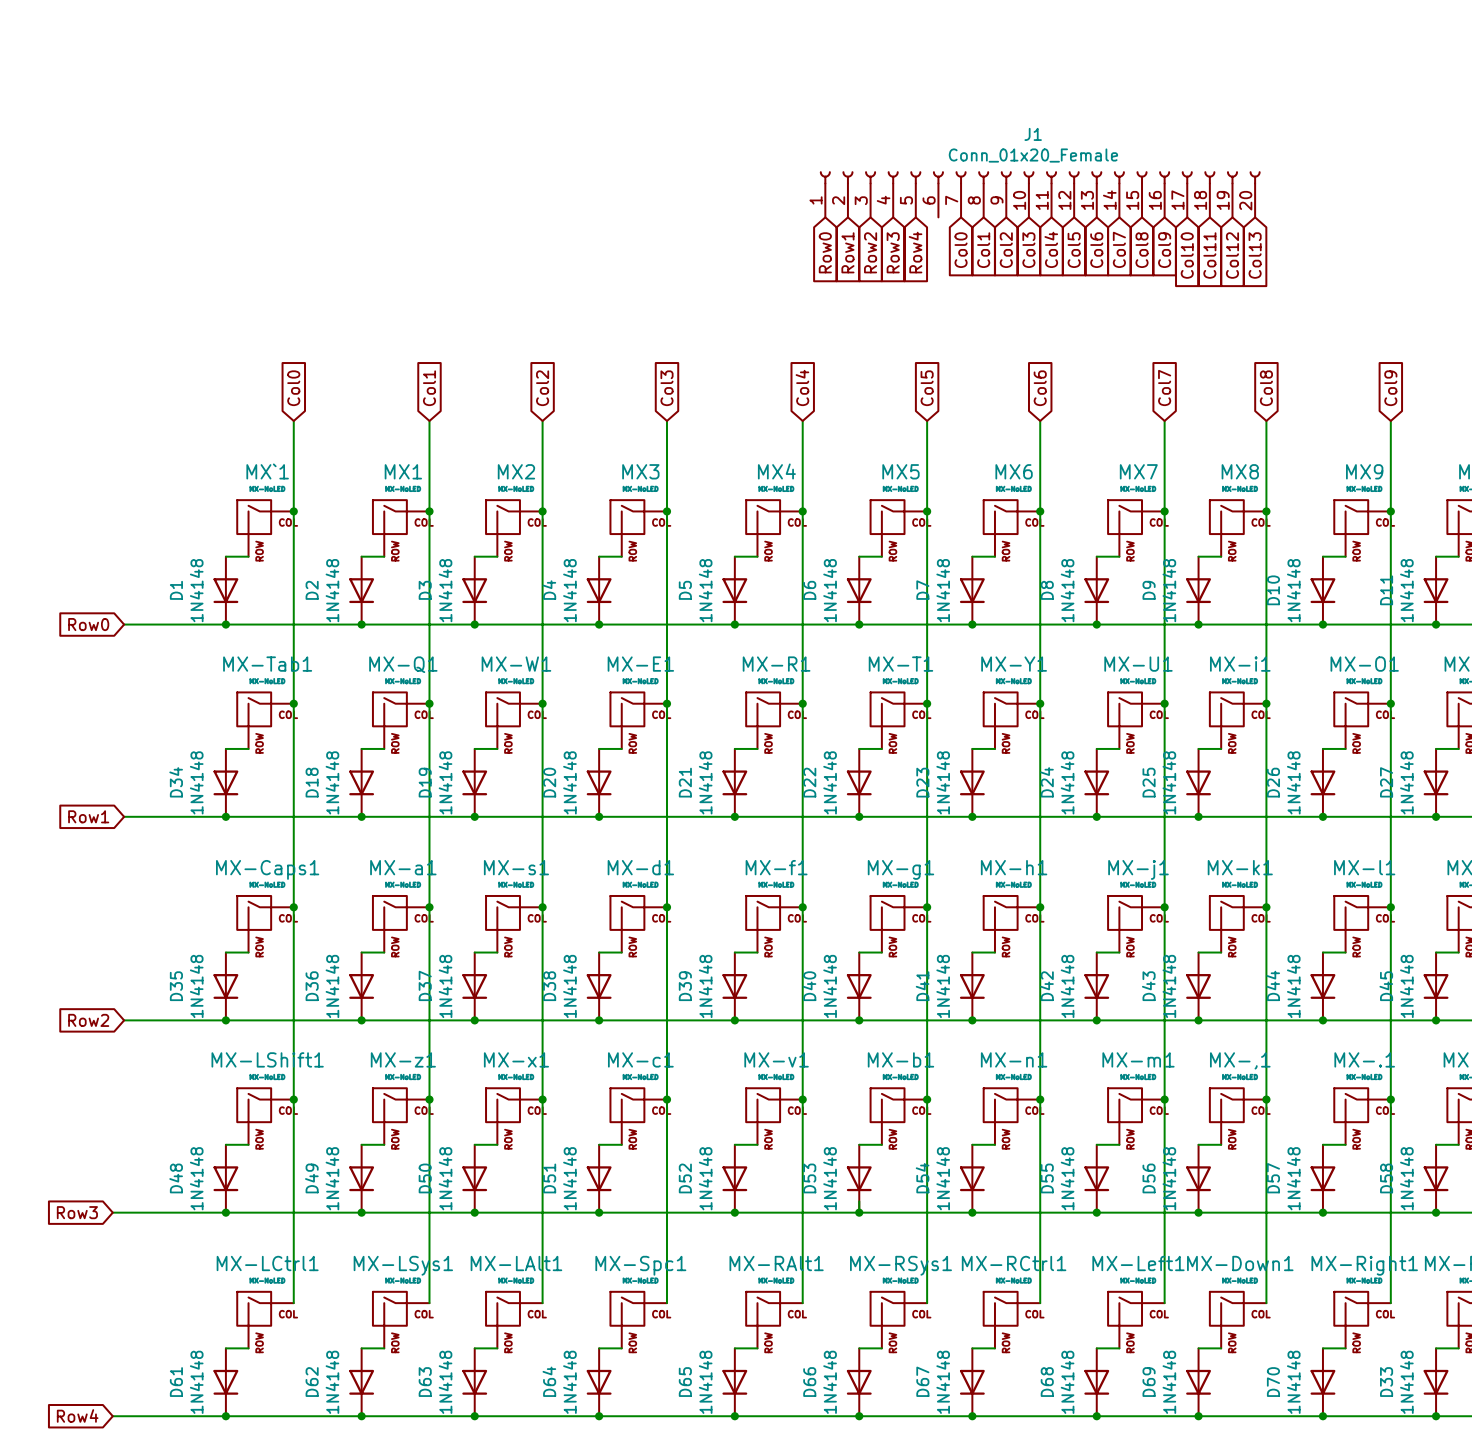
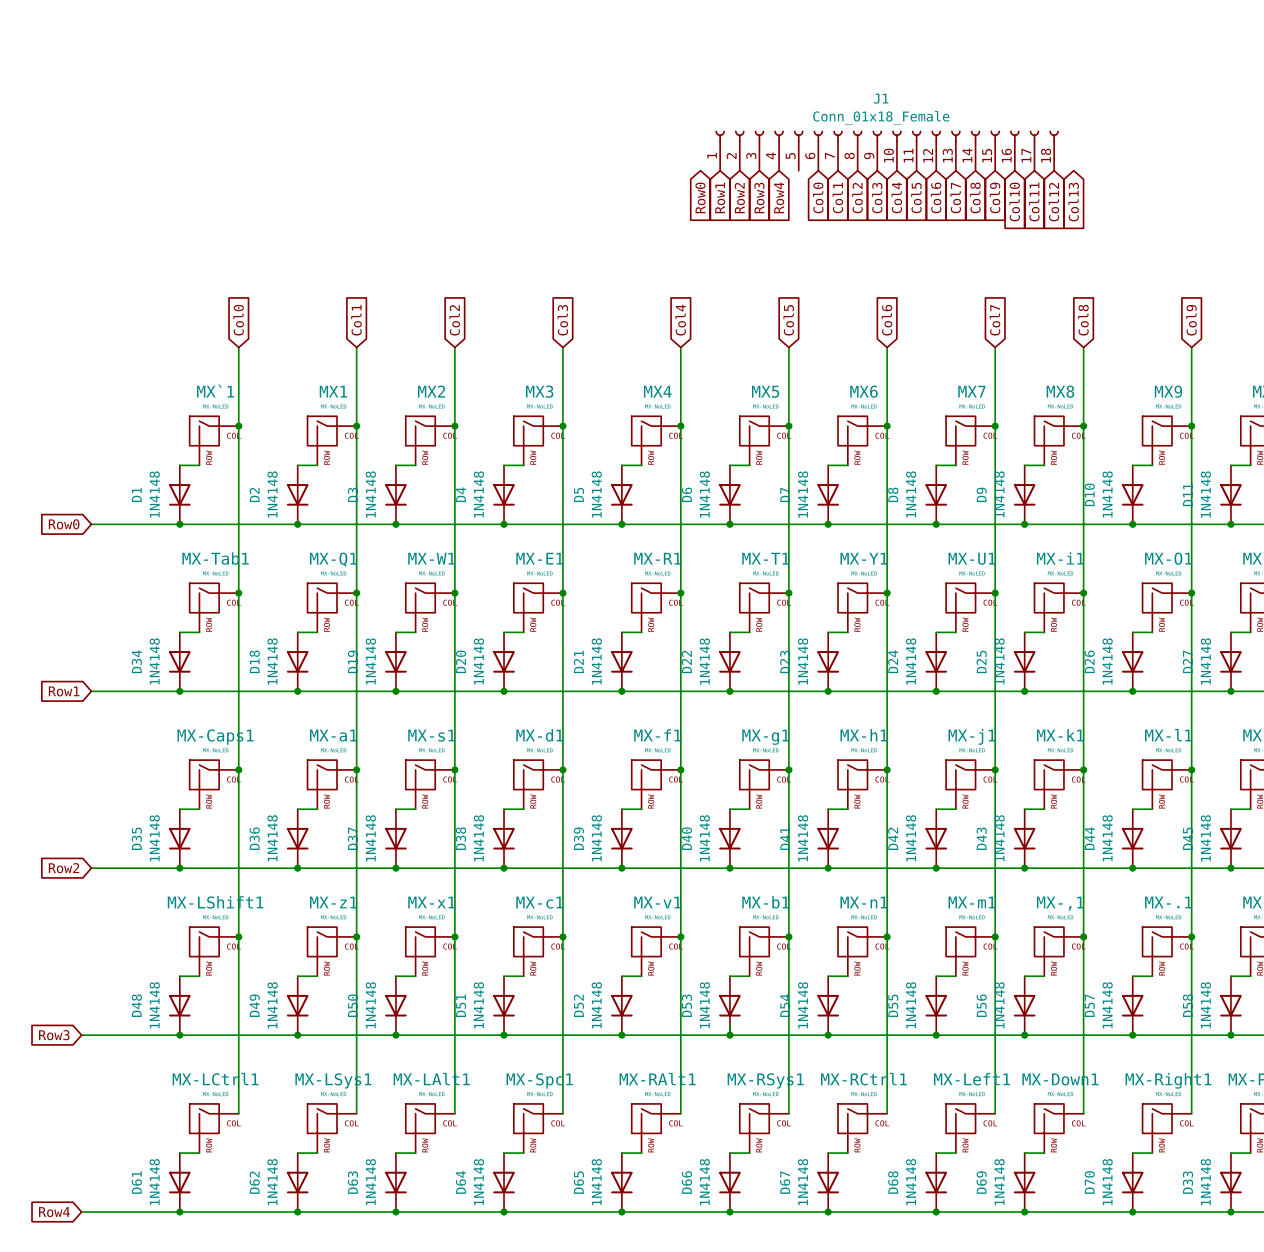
J1 value: Conn_01x20_Female (1033, 155) -> Conn_01x18_Female (881, 117)
J1 symbol: [820, 171, 1261, 218] -> [715, 130, 1059, 171]

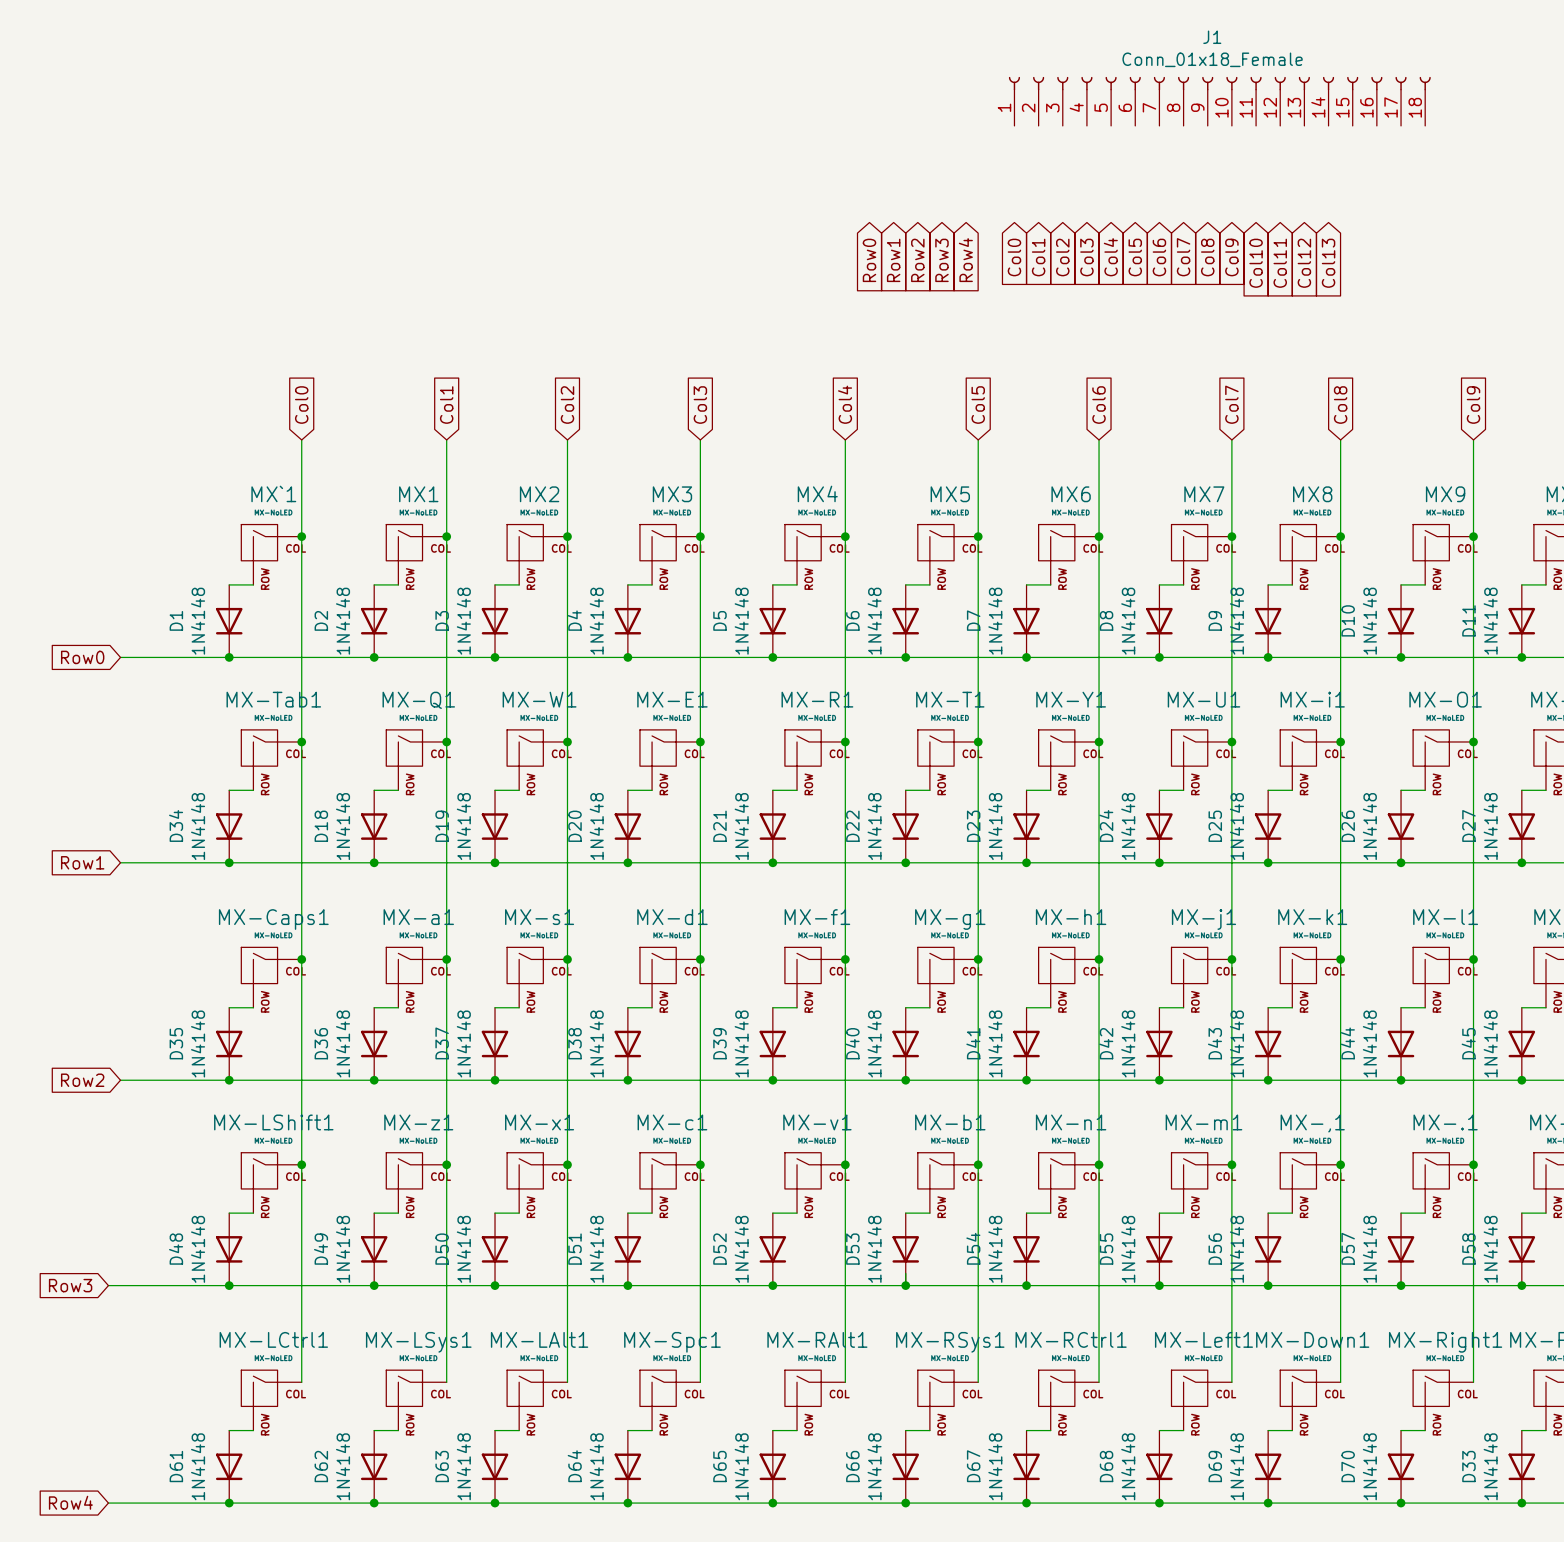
J1 position: (887, 150) -> (1219, 101)

